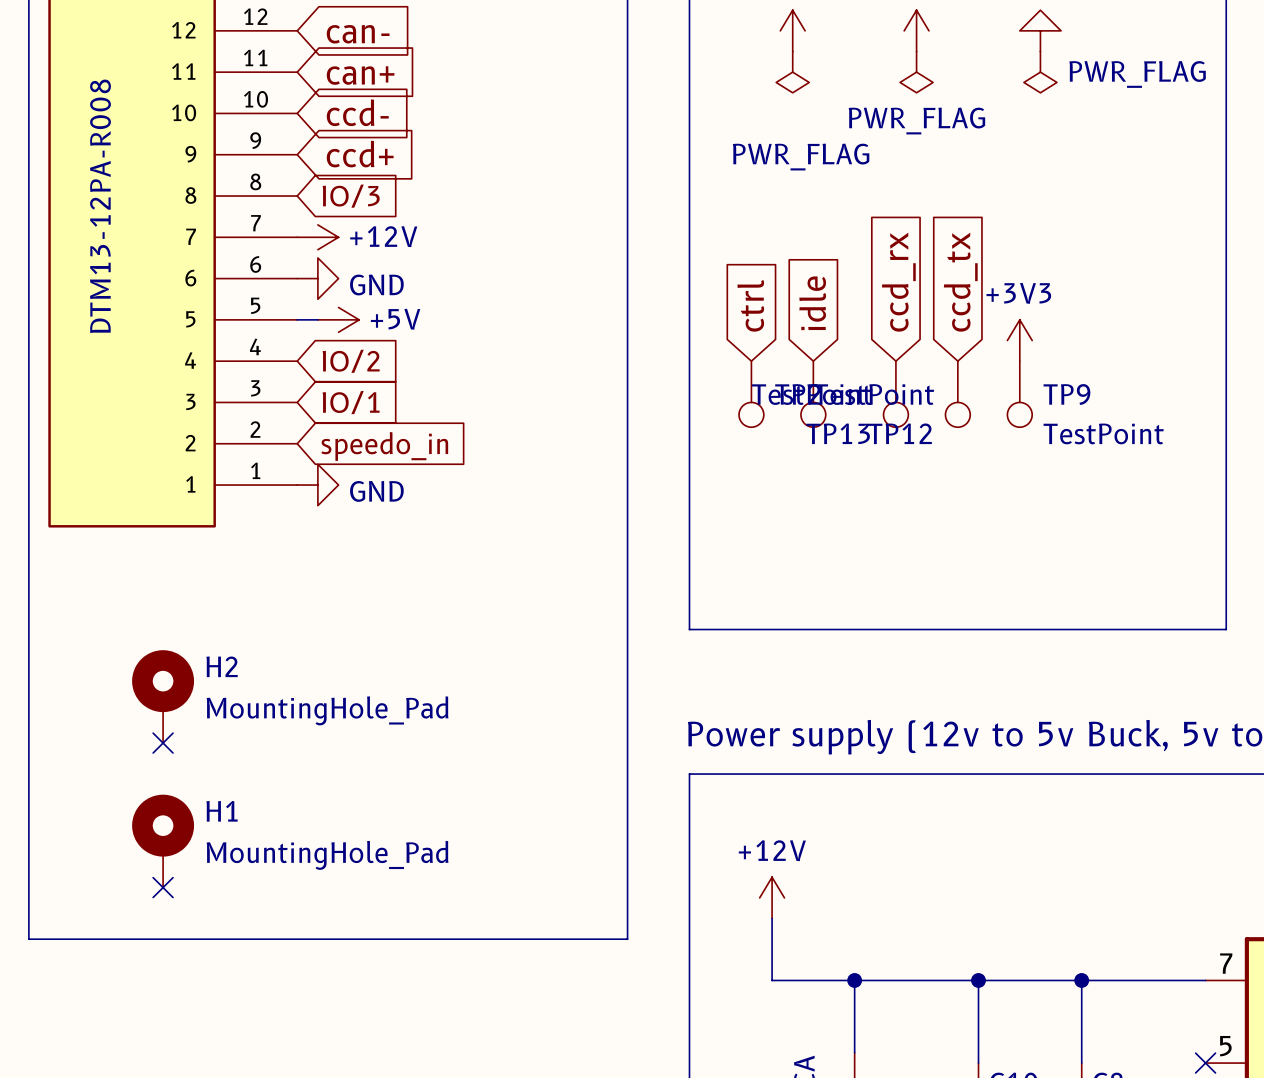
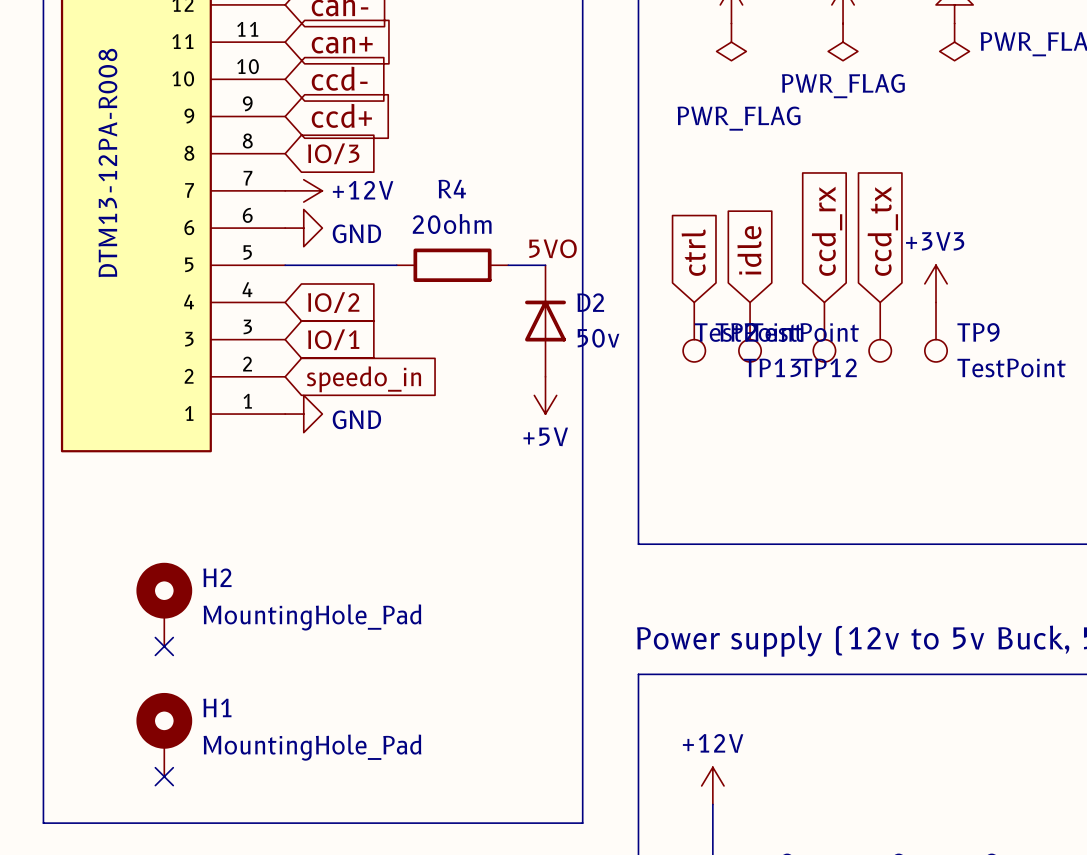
label: none -> 5VO (553, 248)
wire: none -> (303, 265) (396, 265)
power symbol rotation: 0° (338, 319) -> 90° clockwise (545, 395)
power symbol position: +5V (338, 319) -> +5V (545, 395)
R4: none -> 20ohm (452, 265)
wire: none -> (508, 265) (545, 265)
D2: none -> 50v (545, 321)

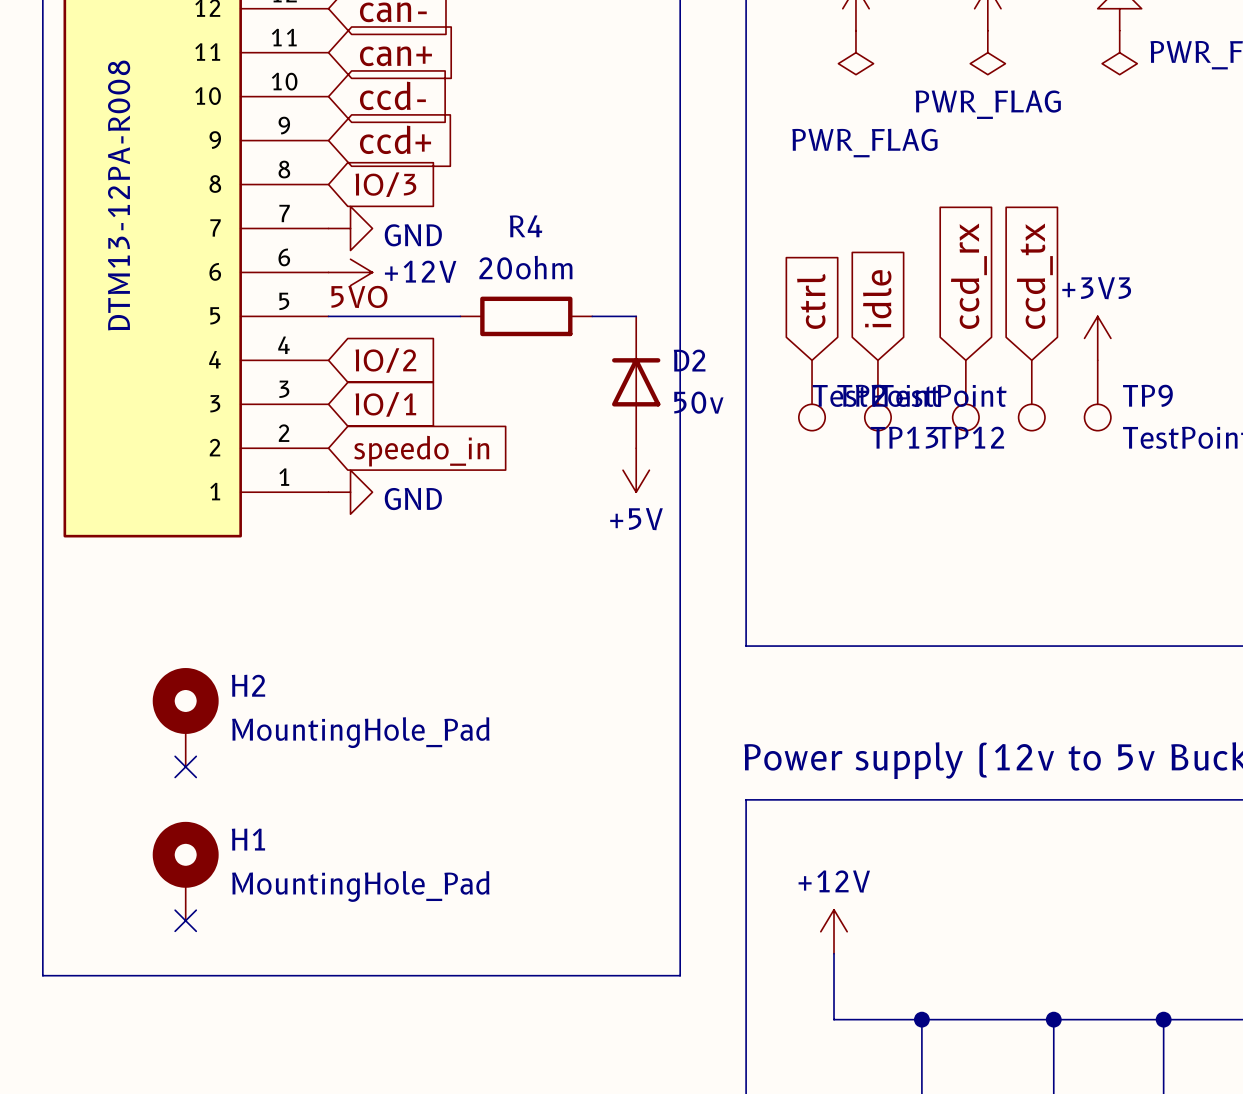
power symbol: +12V (303, 190) -> GND (350, 228)
power symbol: GND (303, 228) -> +12V (350, 272)
label position: 5VO (553, 248) -> 5VO (359, 296)

